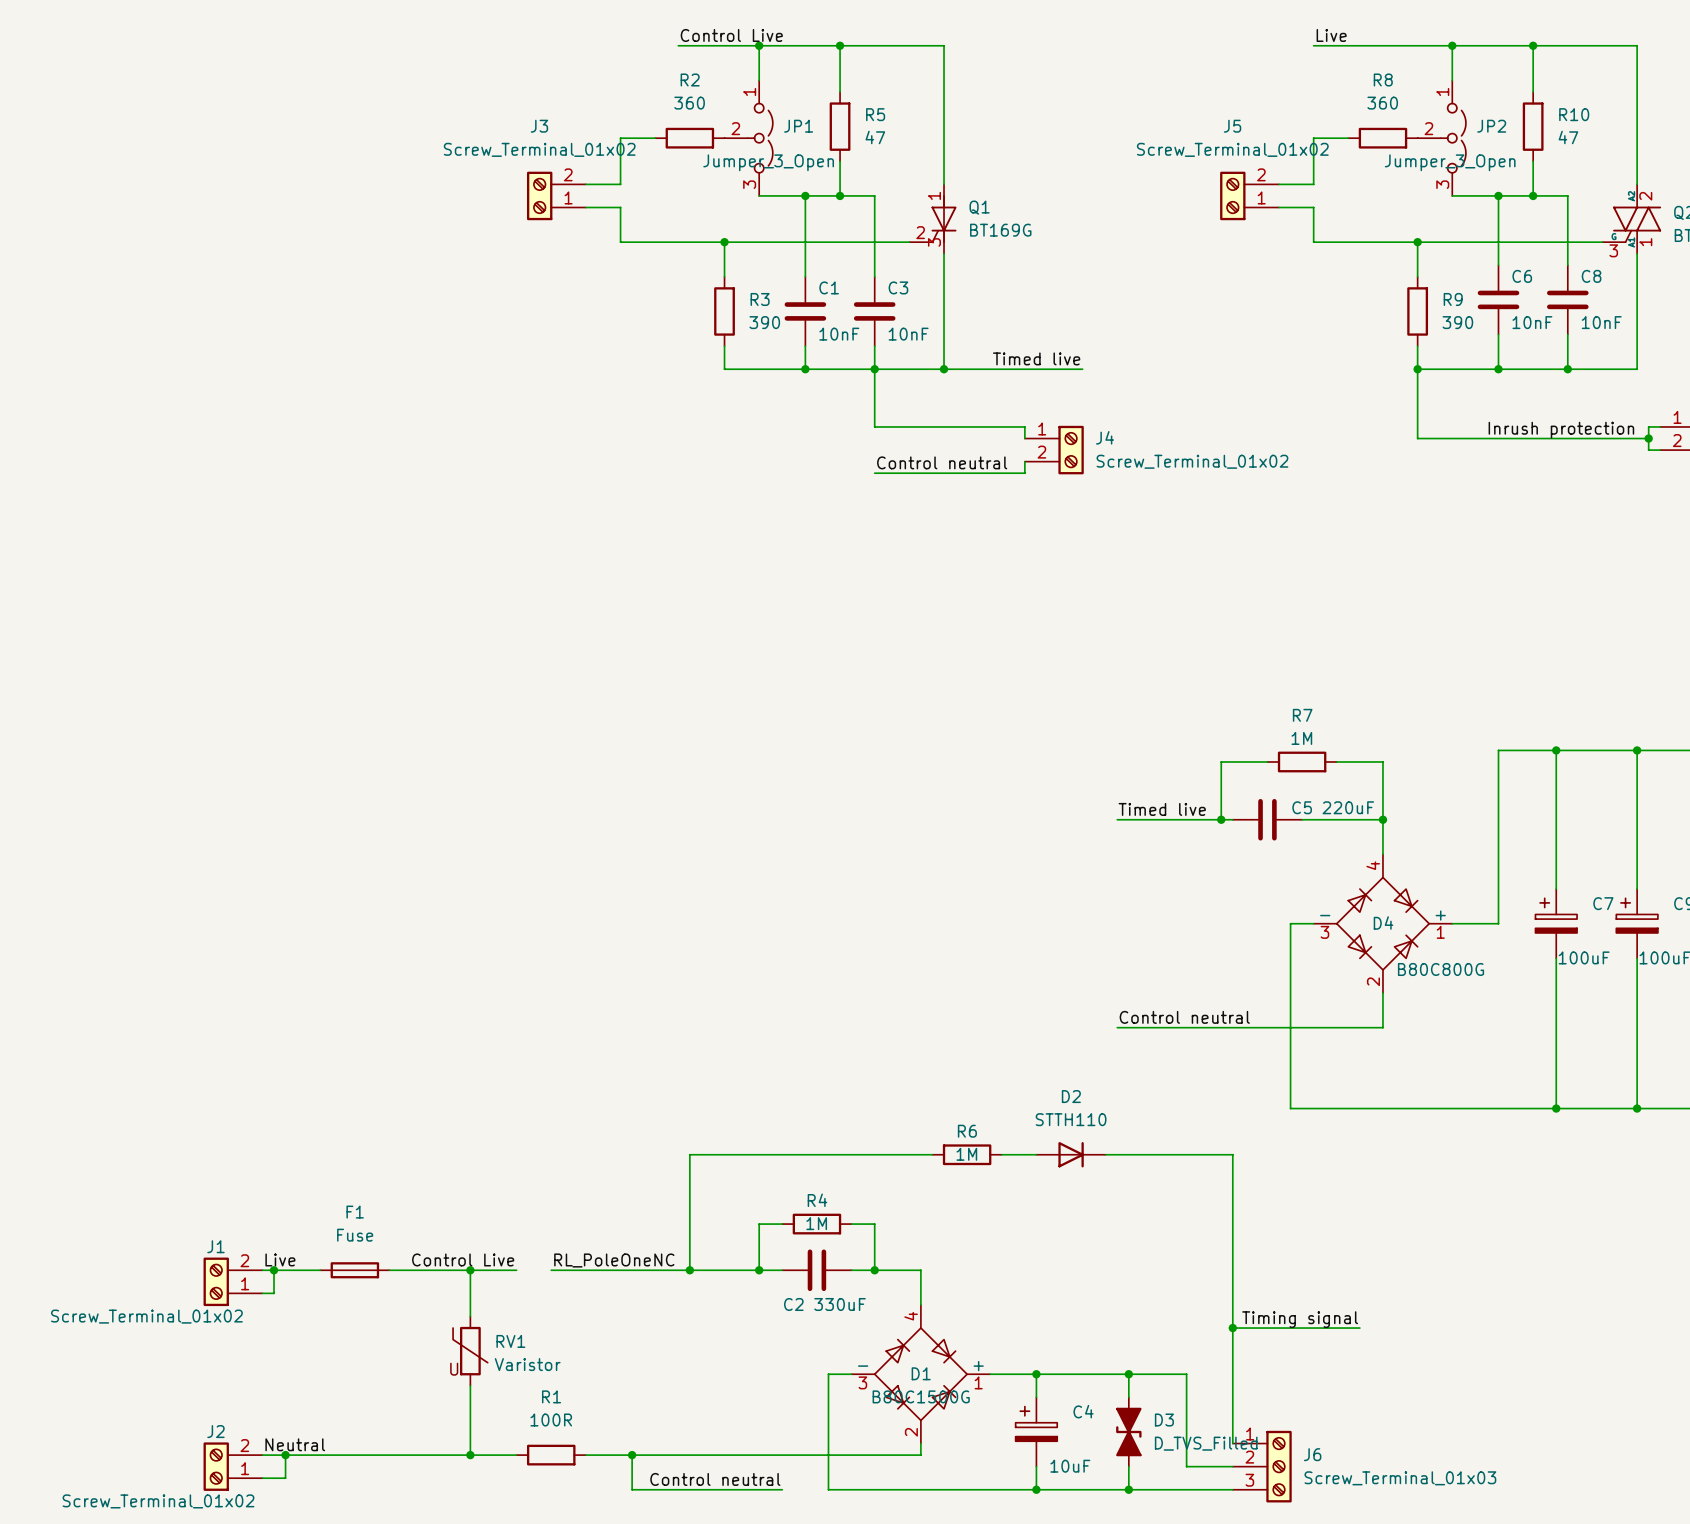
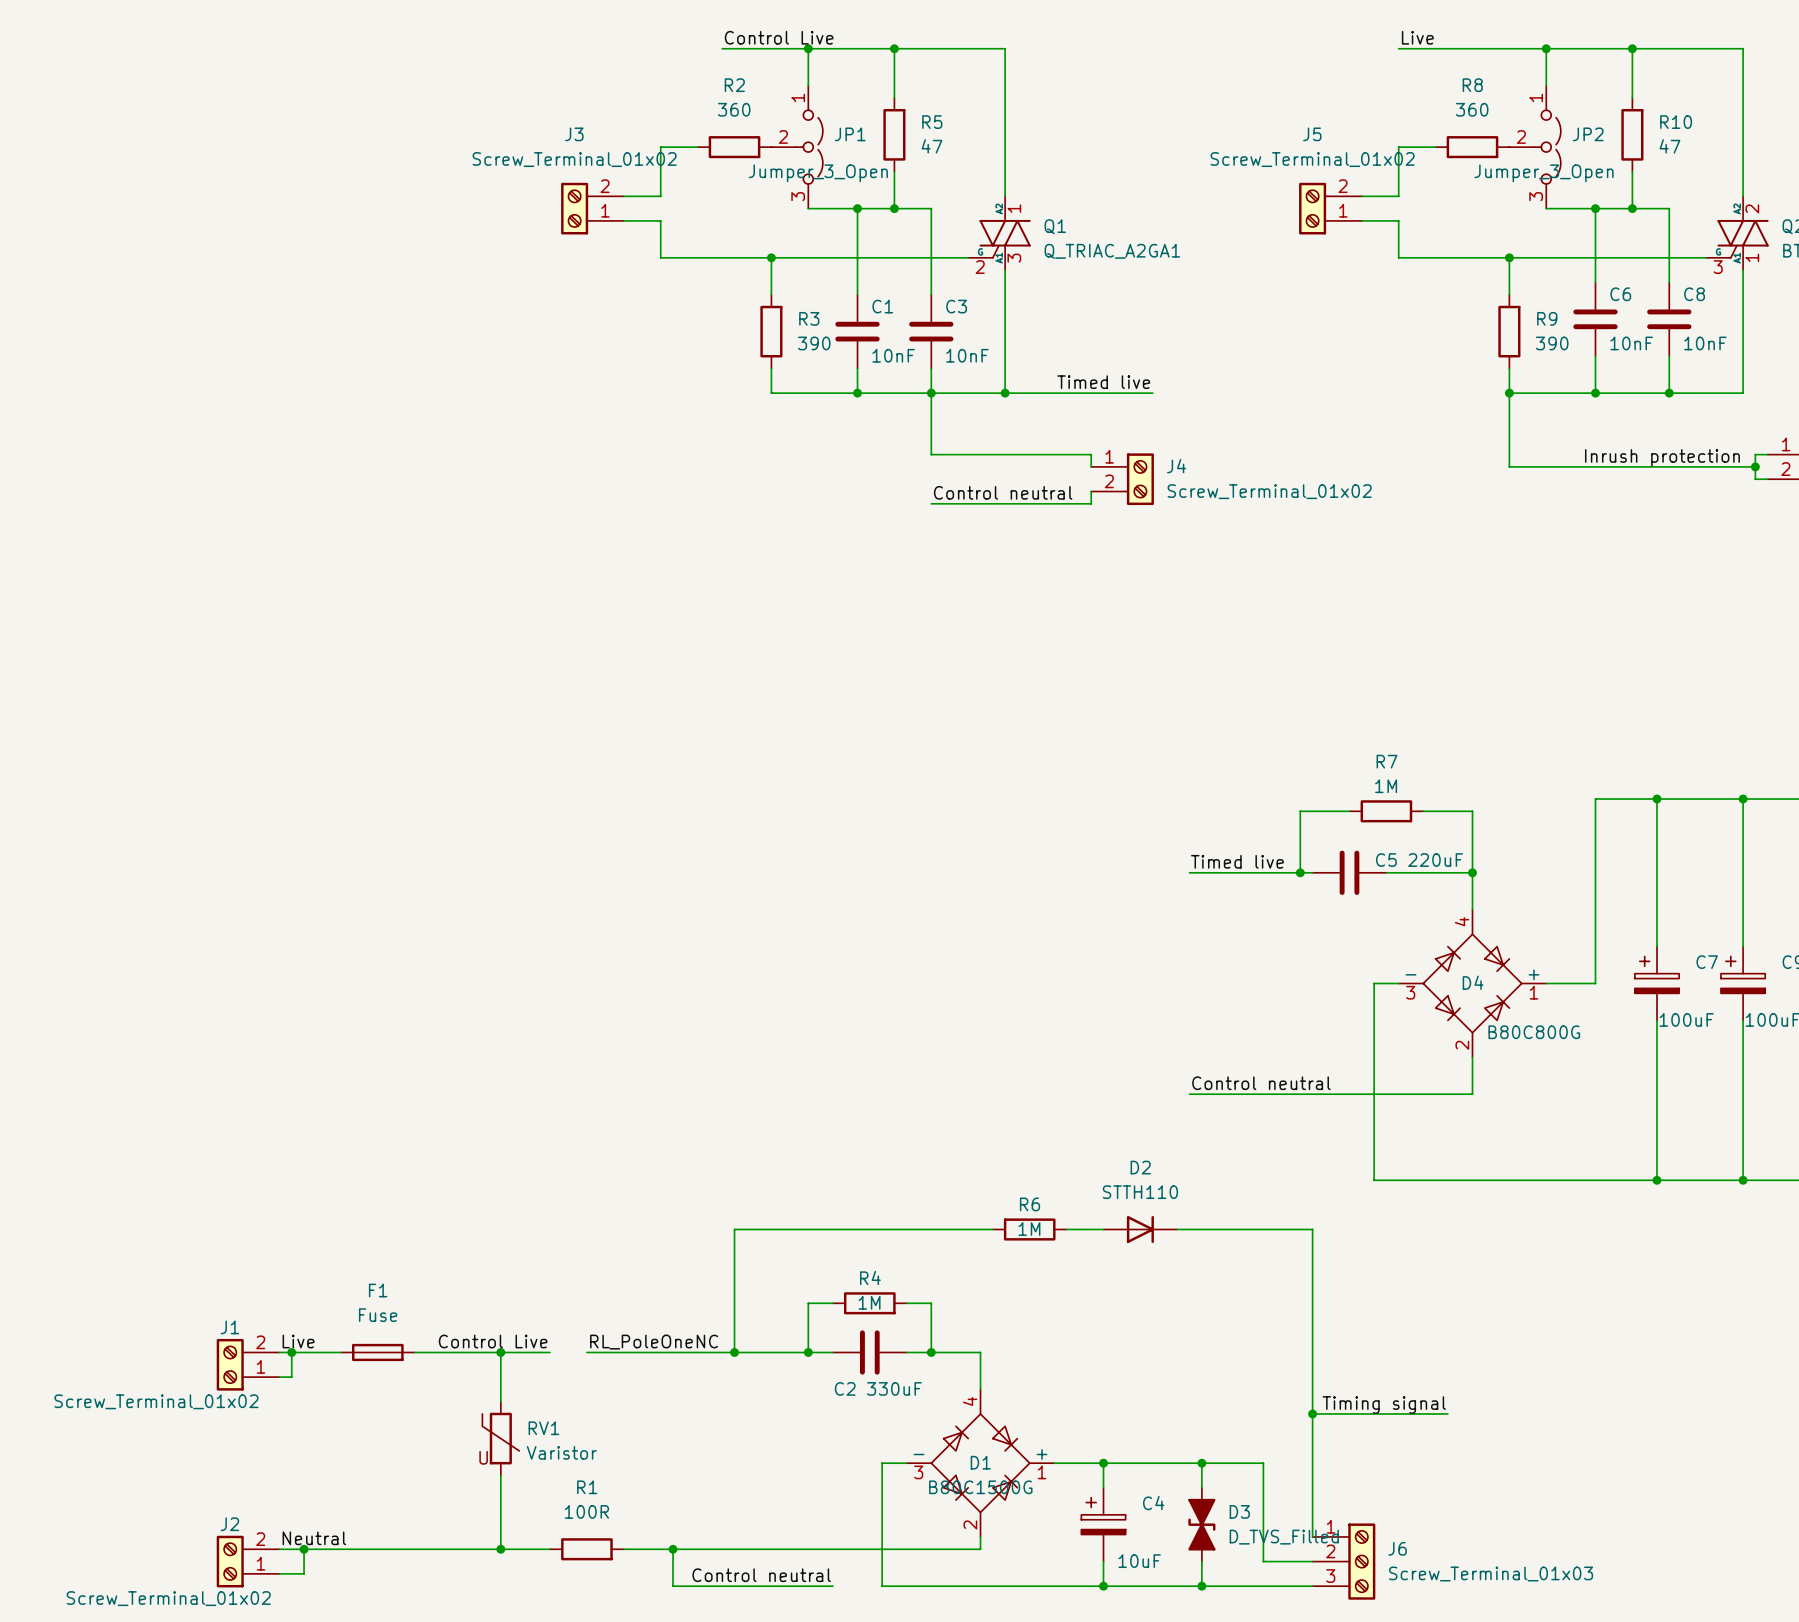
Q1 symbol: [909, 184, 957, 254] -> [968, 196, 1031, 271]
Q1 value: BT169G (1000, 230) -> Q_TRIAC_A2GA1 (1112, 251)

